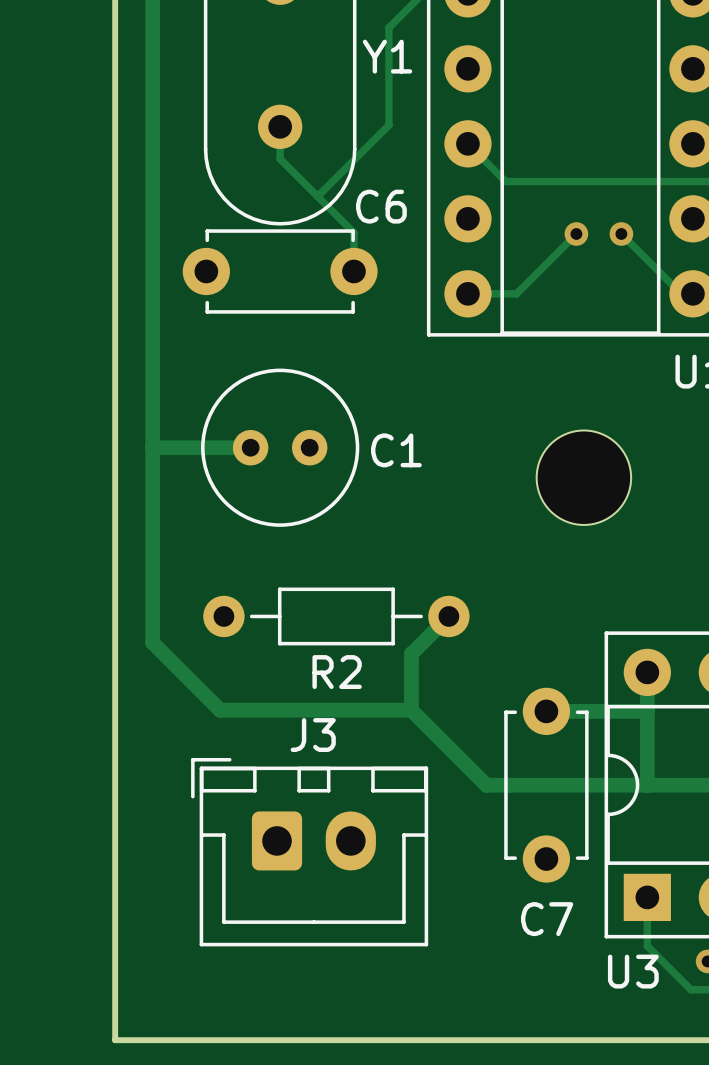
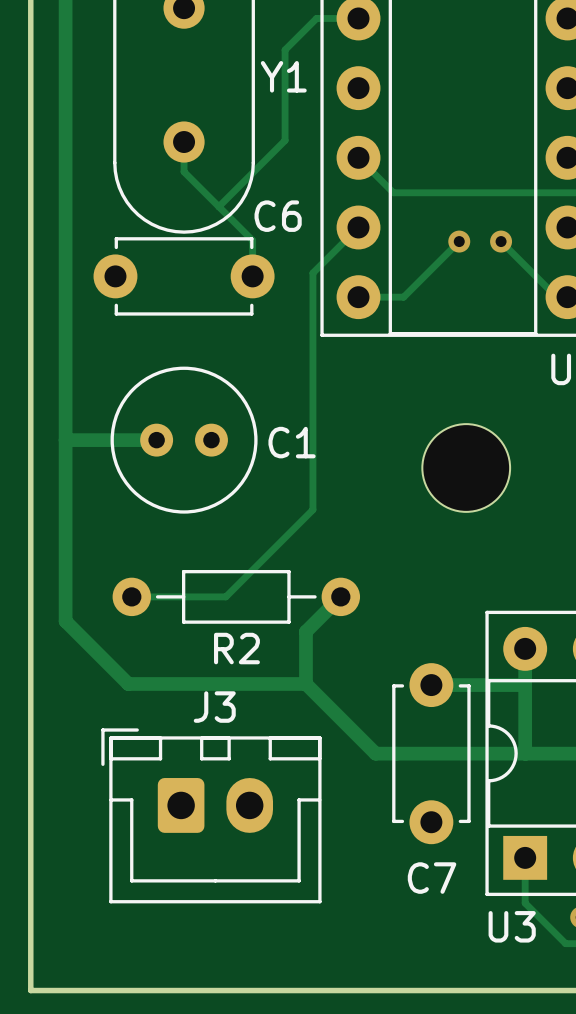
track: none -> (358, 227) (312, 273) (312, 509) (225, 596) (131, 596)

